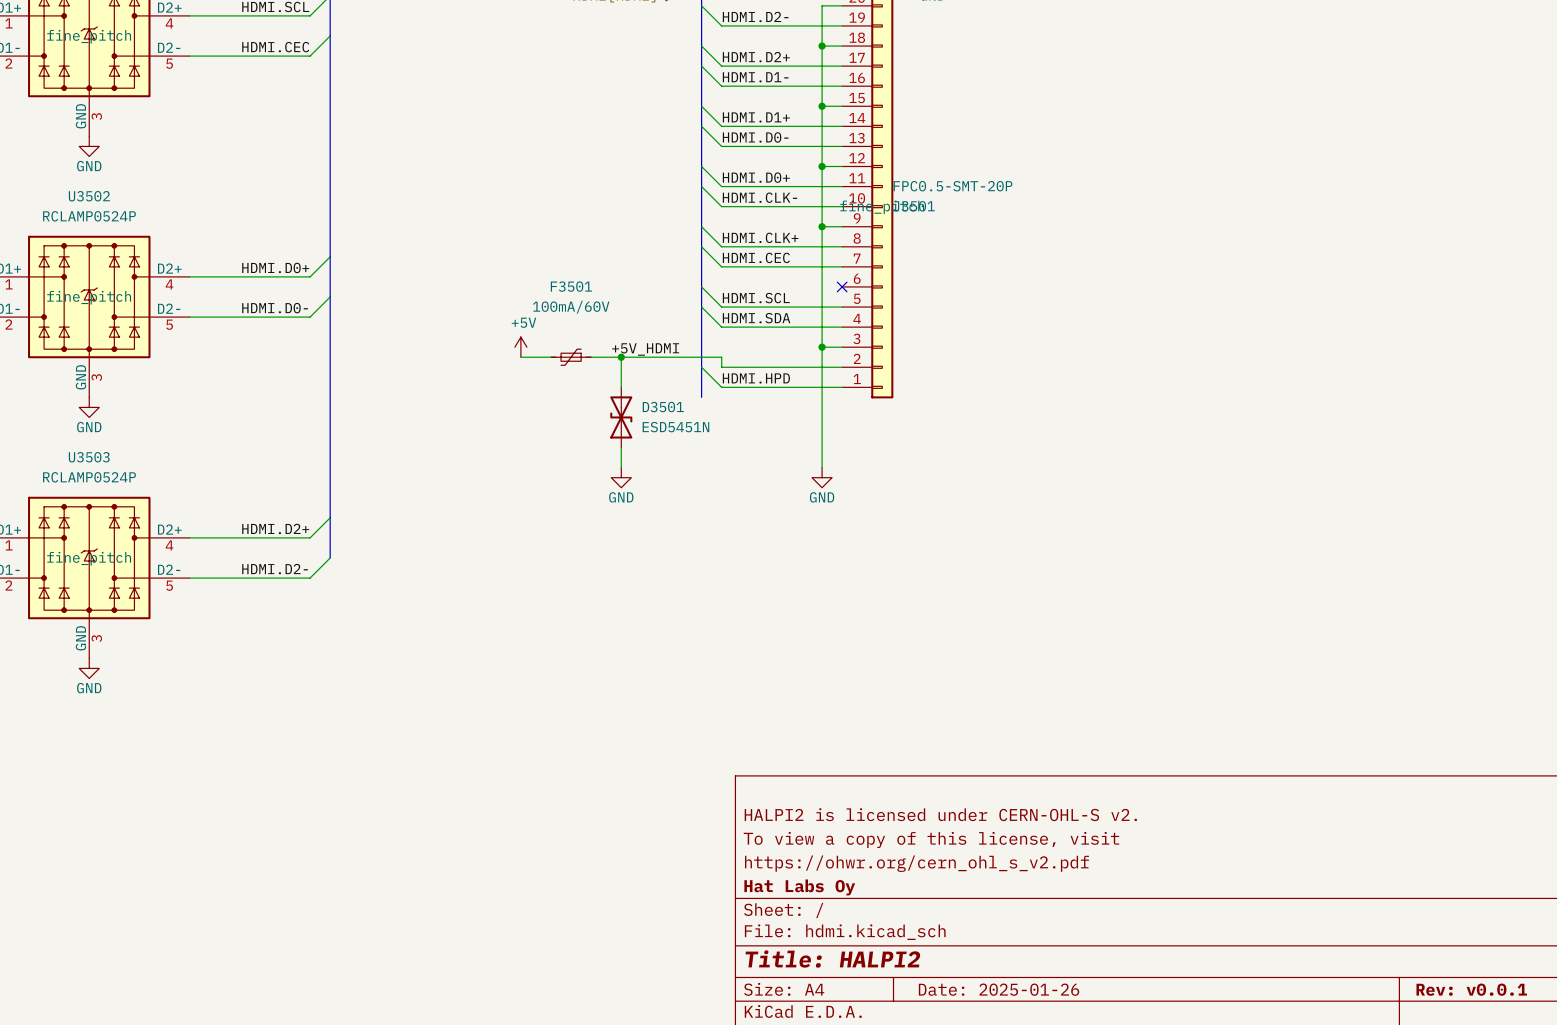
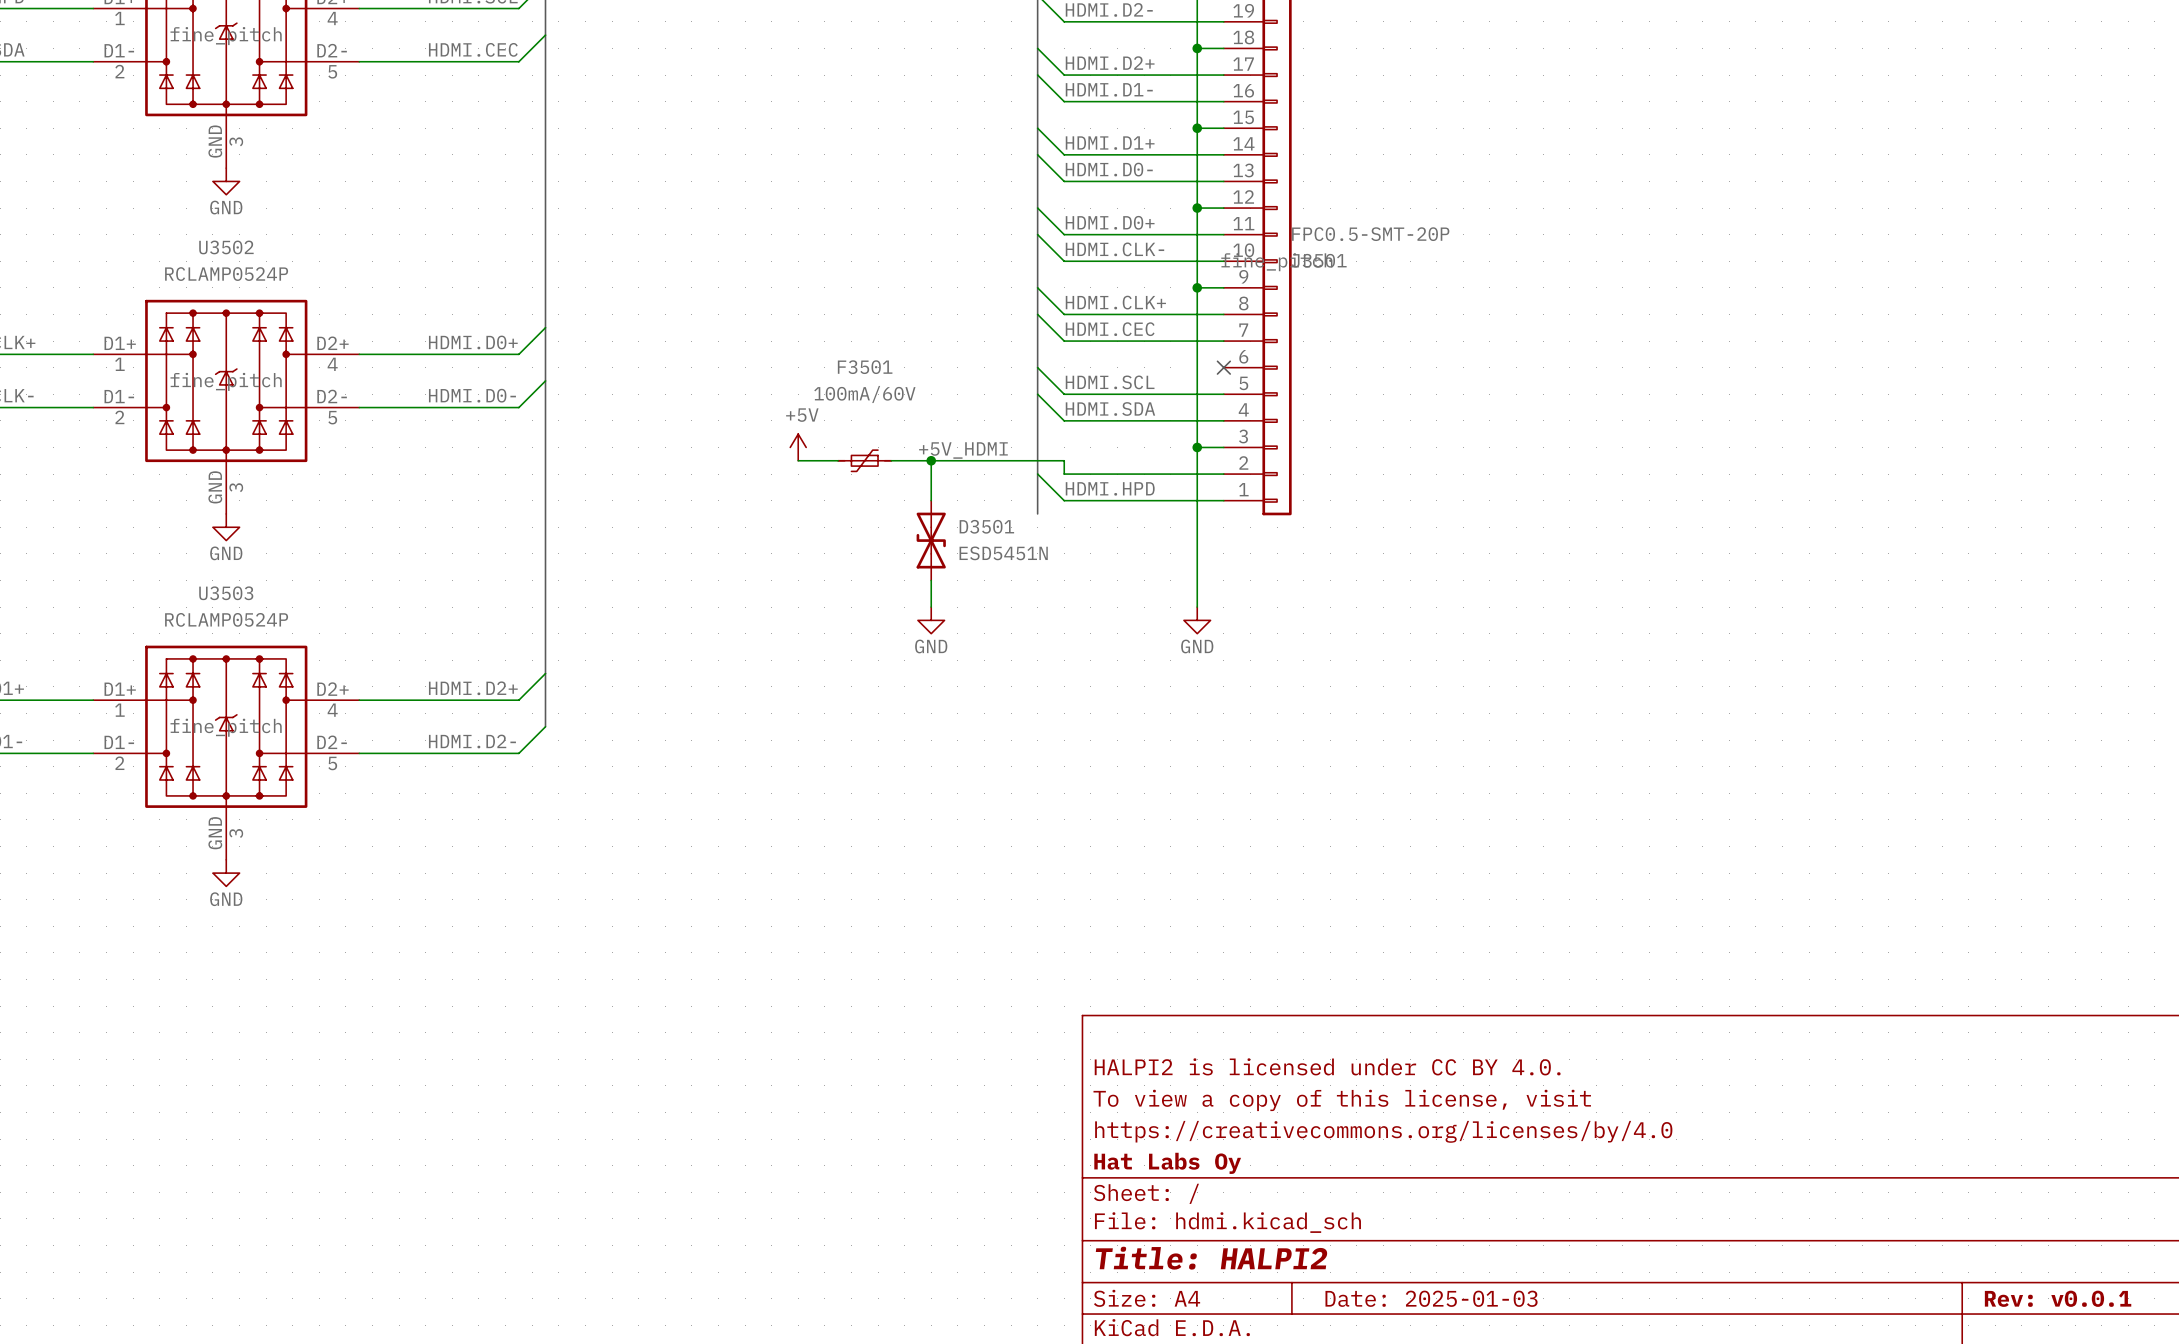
title block: HALPI2 is licensed under CERN-OHL-S v2. (940, 814) -> HALPI2 is licensed under CC BY 4.0. (1327, 1066)
title block: https://ohwr.org/cern_ohl_s_v2.pdf (916, 863) -> https://creativecommons.org/licenses/by/4.0 (1383, 1131)
title block: Date: 2025-01-26 (999, 989) -> Date: 2025-01-03 (1431, 1298)

